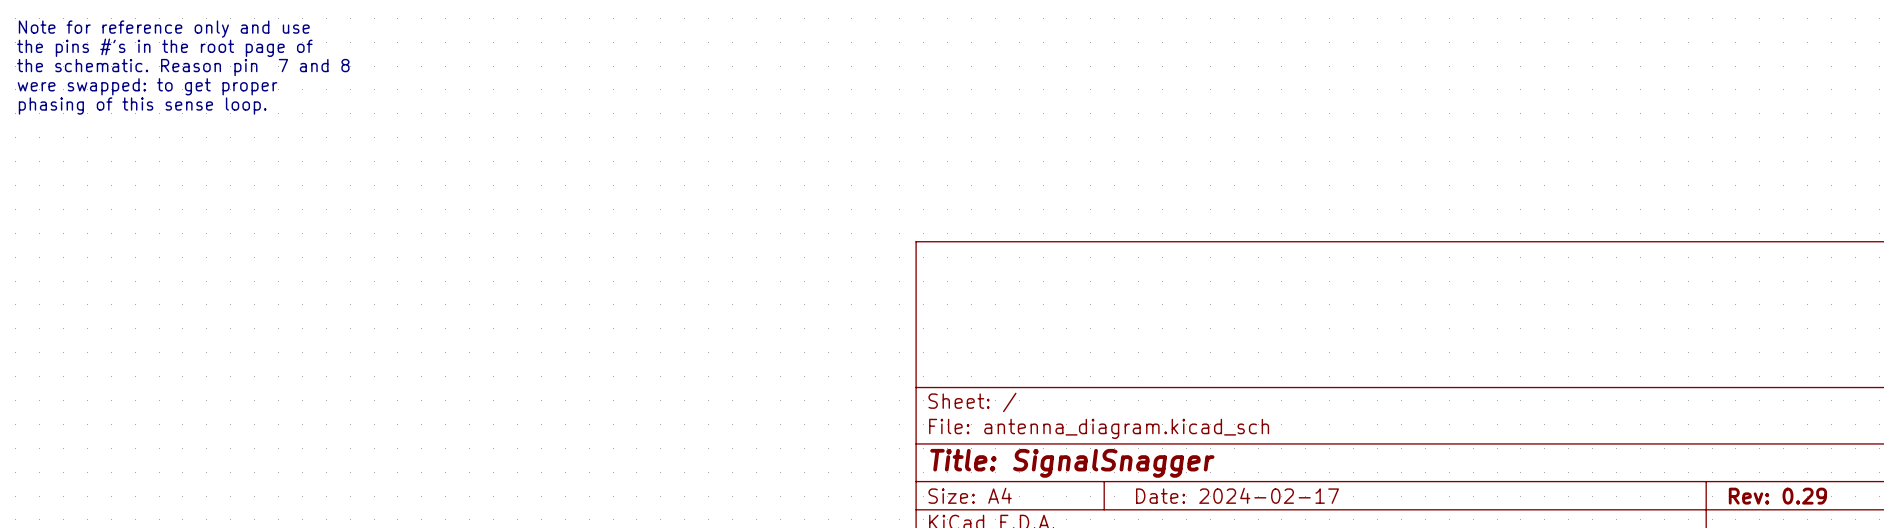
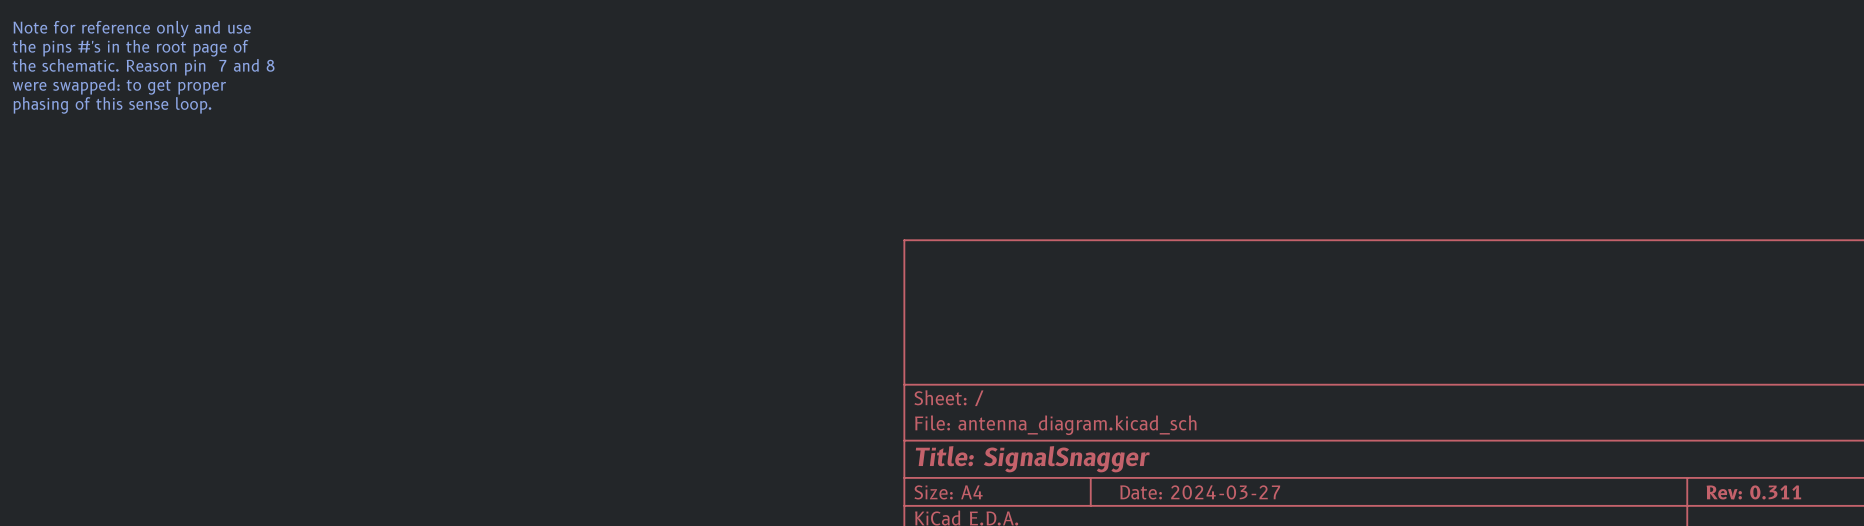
title block: Date: 2024-02-17 (1237, 495) -> Date: 2024-03-27 (1200, 492)
title block: Rev: 0.29 (1777, 496) -> Rev: 0.311 (1753, 492)

